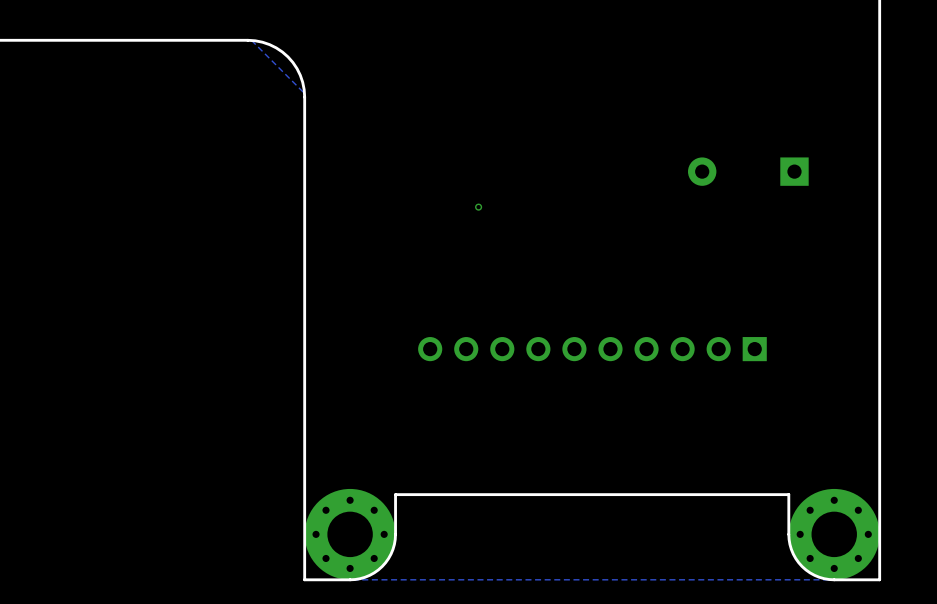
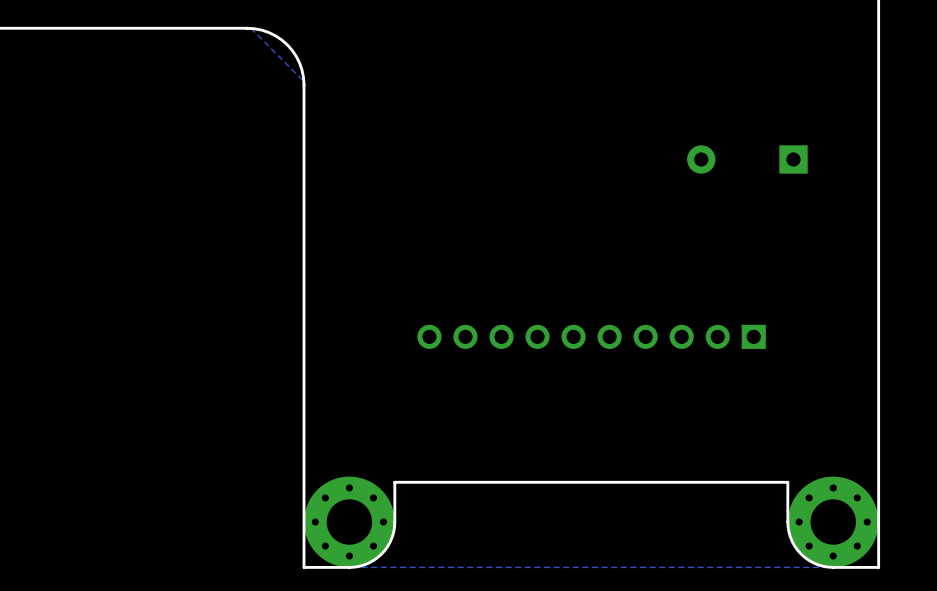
via: (478, 207) -> none

